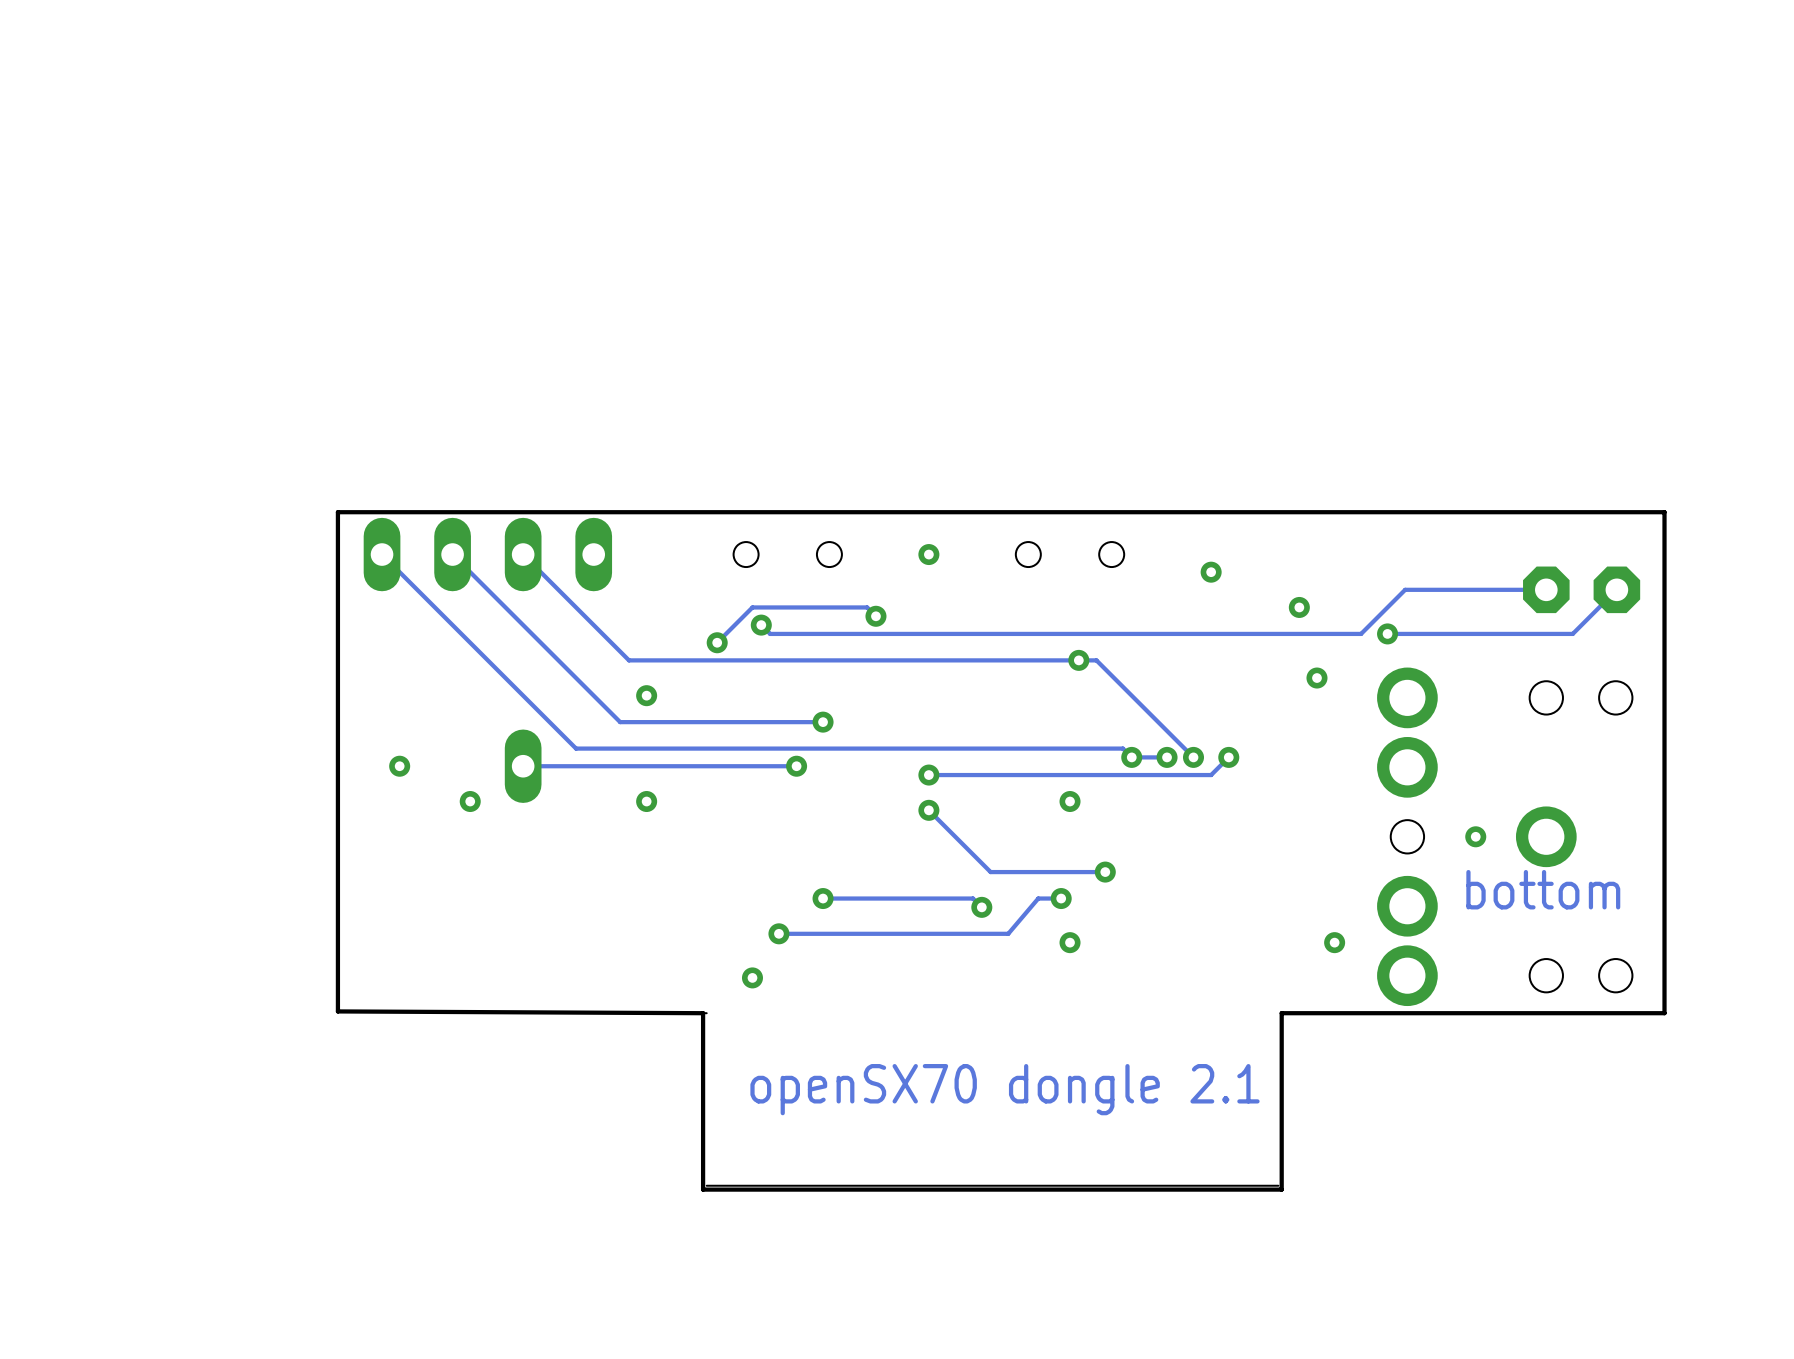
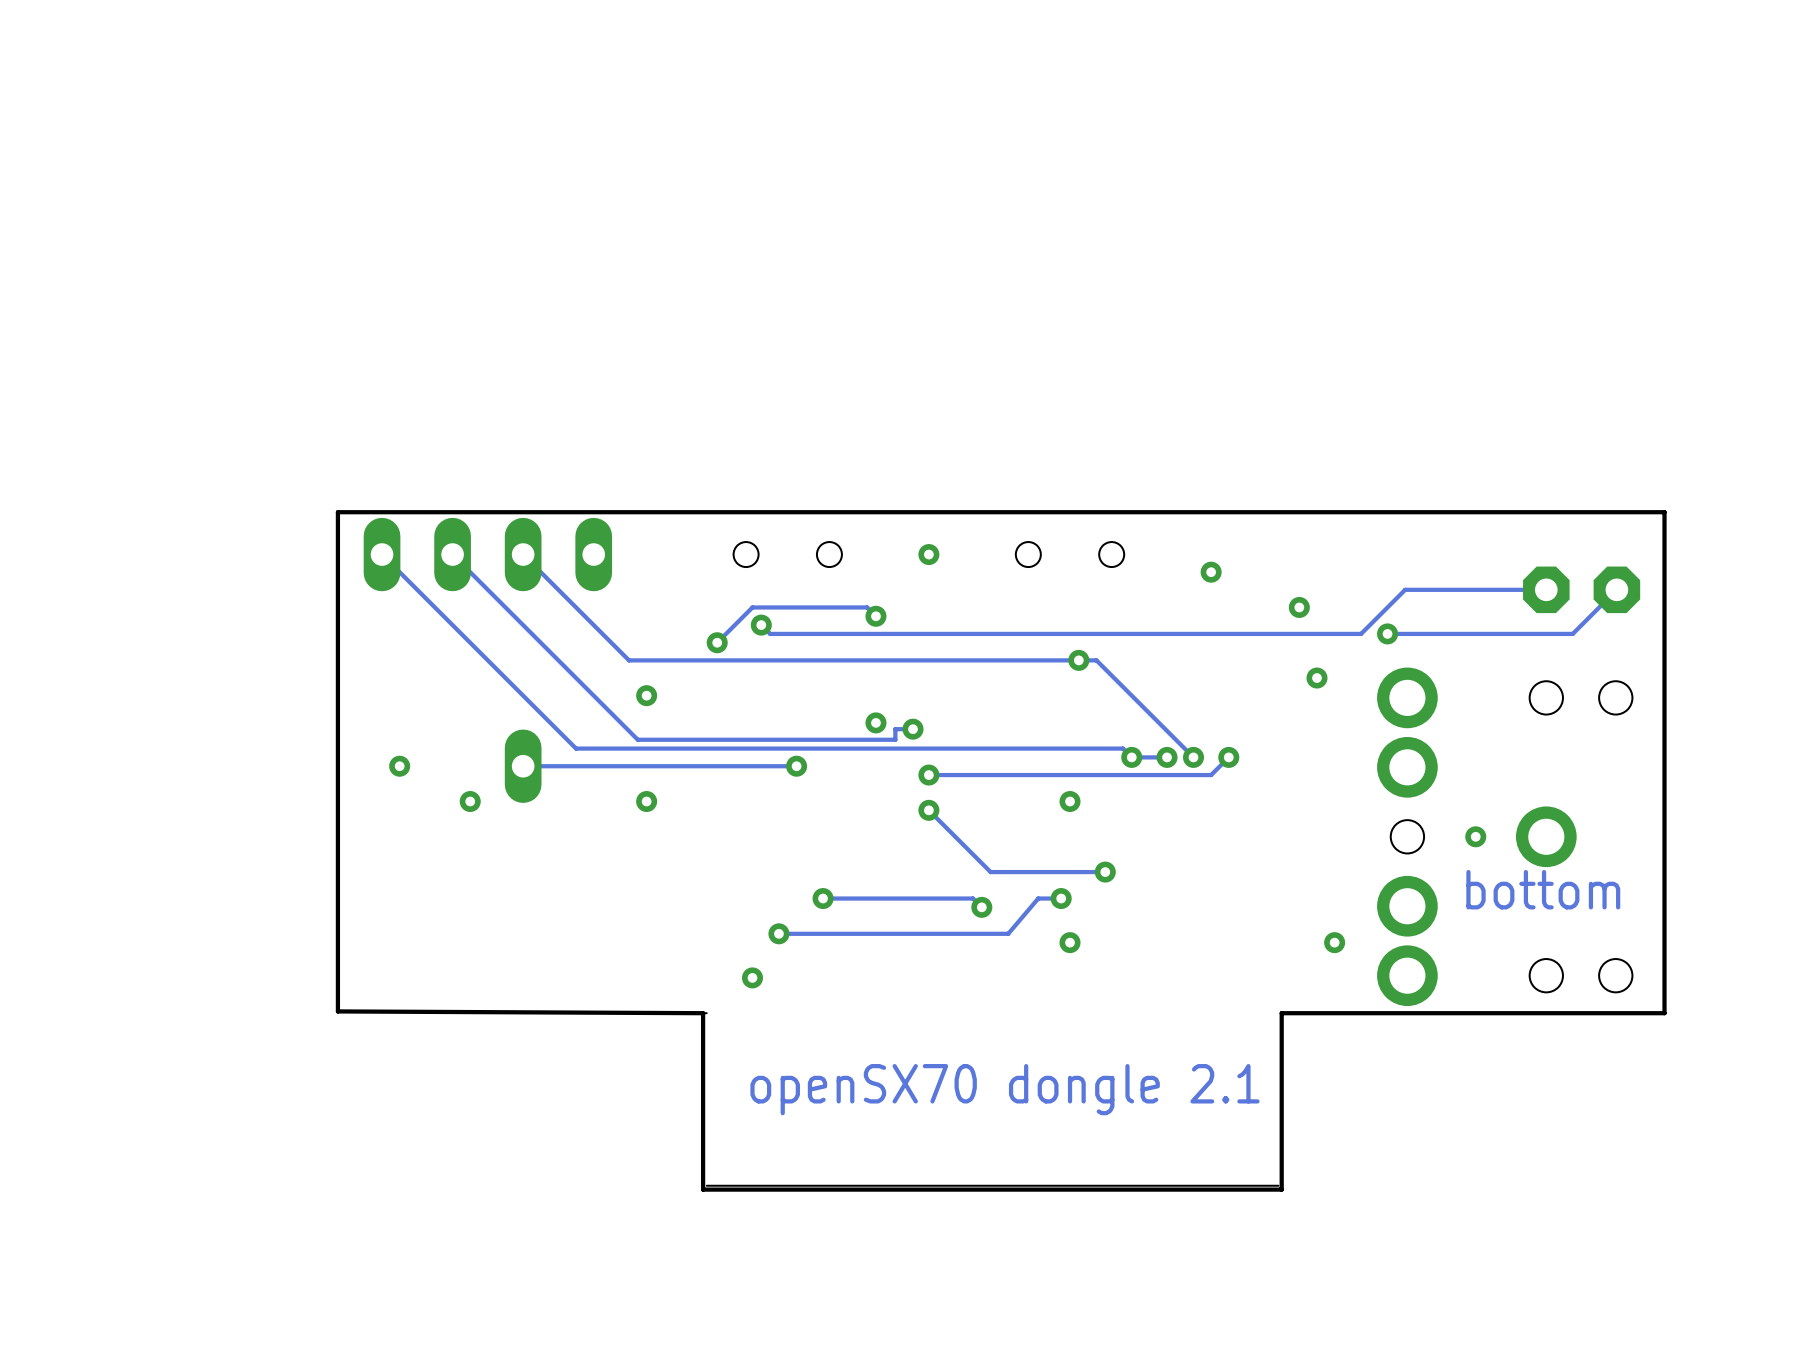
track: (823, 722) (620, 722) -> (913, 729) (895, 729) (895, 739) (637, 739) (620, 722)
via: (823, 722) -> none
via: none -> (875, 722)
via: none -> (913, 729)

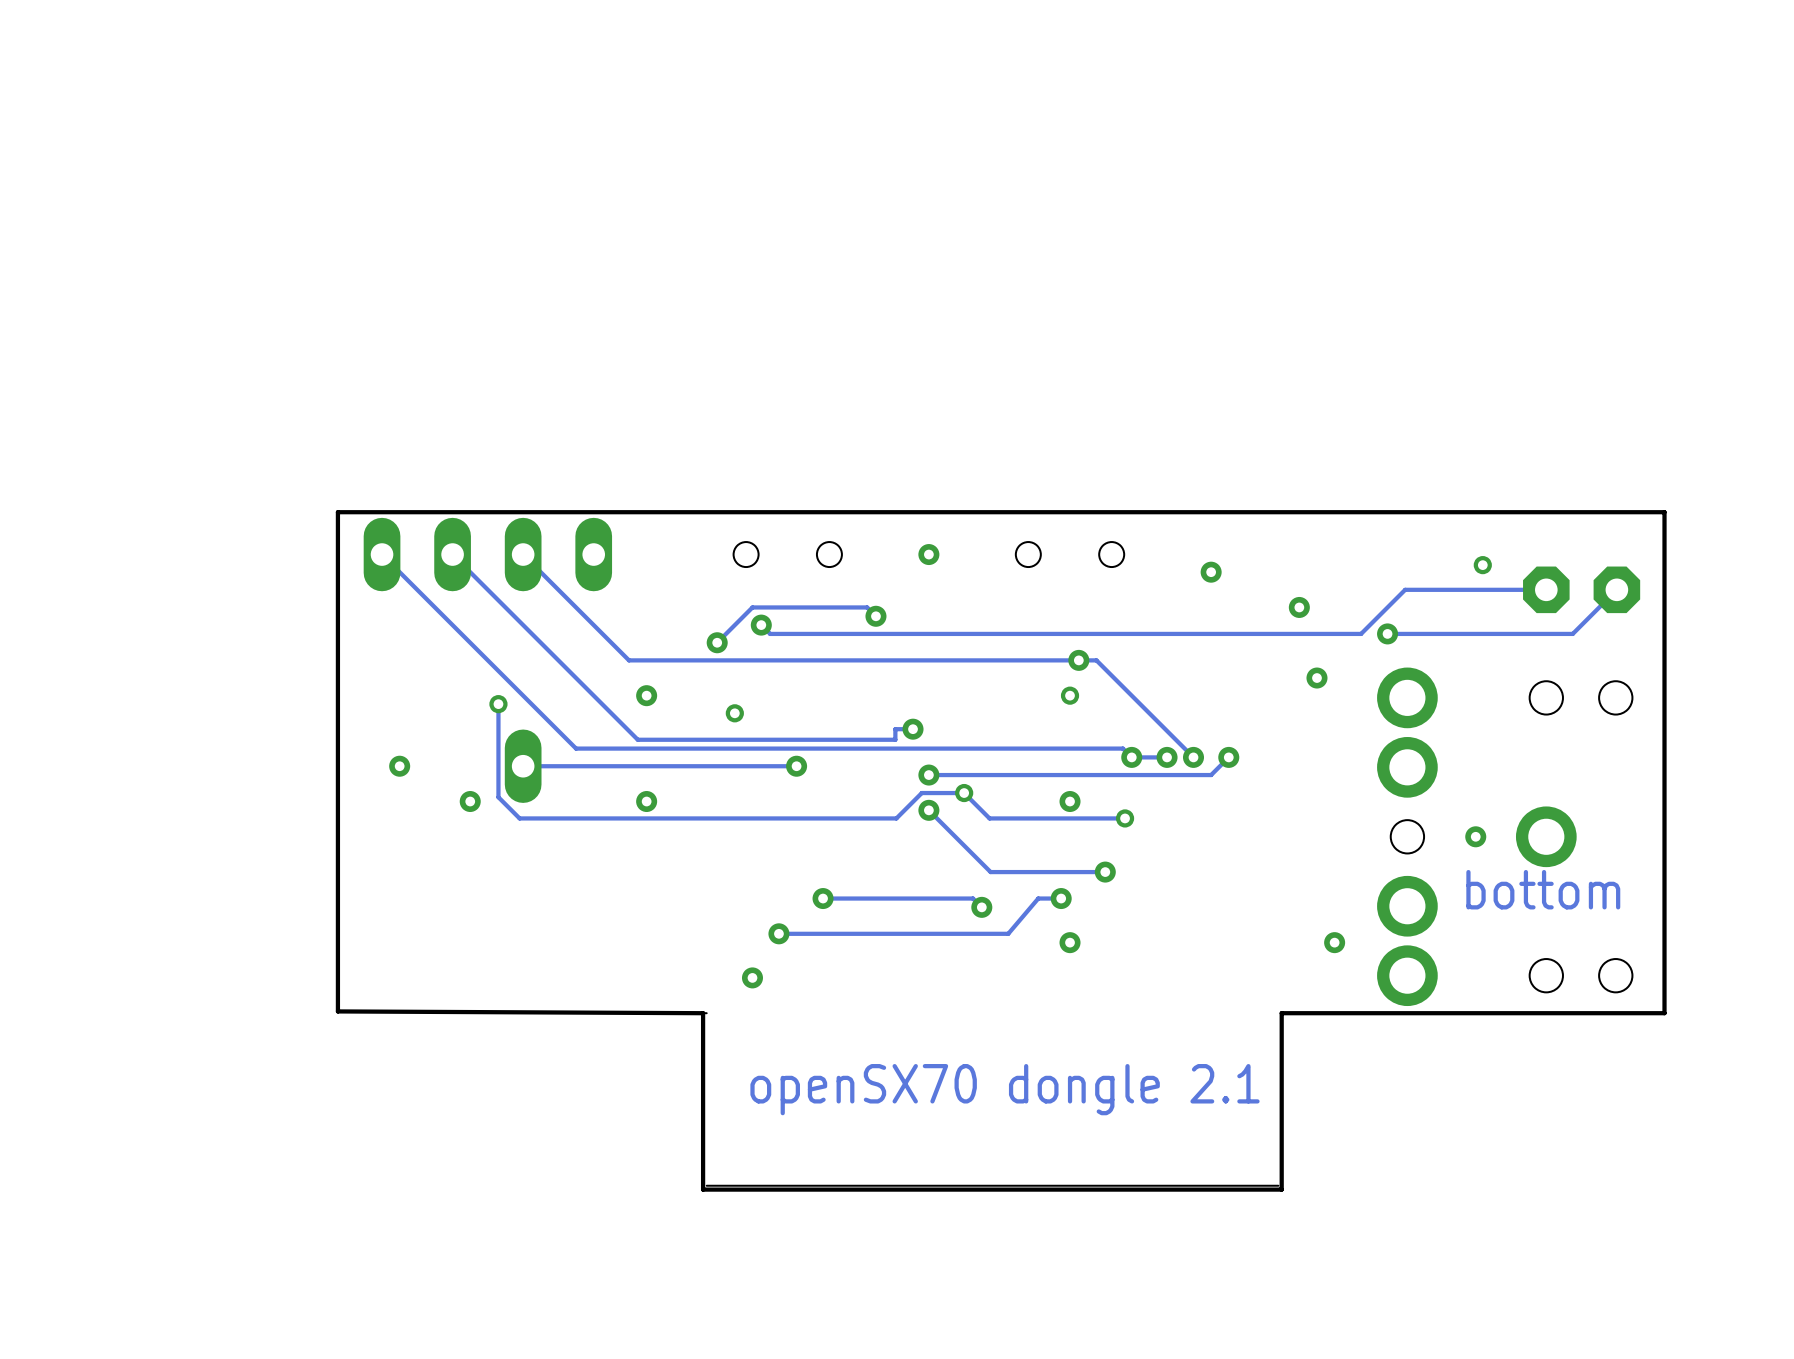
via: none -> (1482, 565)
via: none -> (1070, 695)
track: none -> (498, 704) (498, 797) (519, 818) (896, 818) (921, 793) (964, 793) (989, 818) (1125, 818)
via: none -> (498, 704)
via: none -> (734, 713)
via: (875, 722) -> none
via: none -> (964, 793)
via: none -> (1125, 818)

